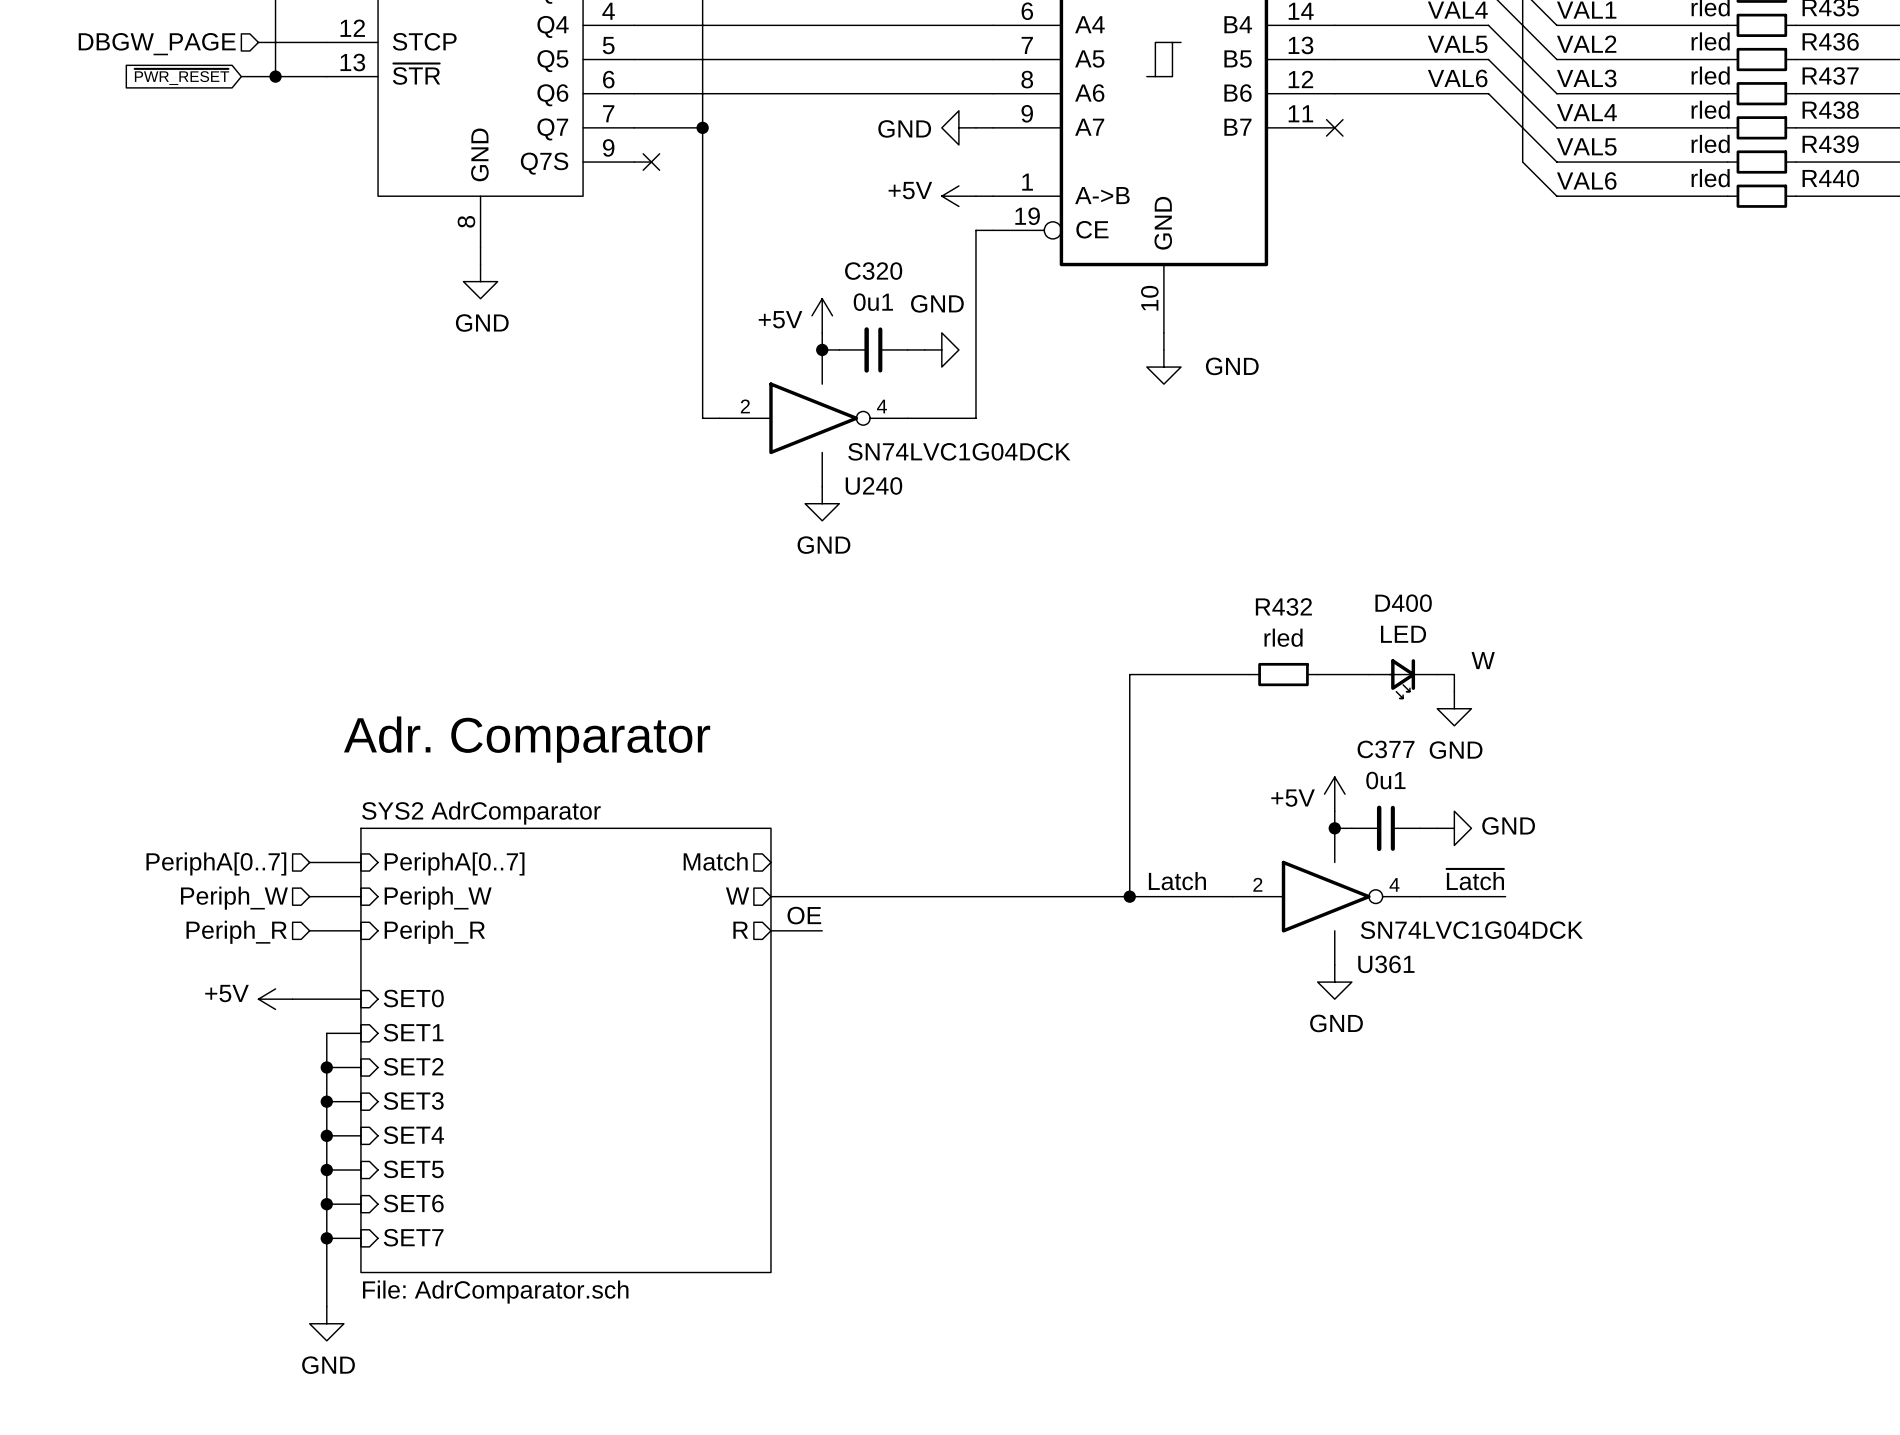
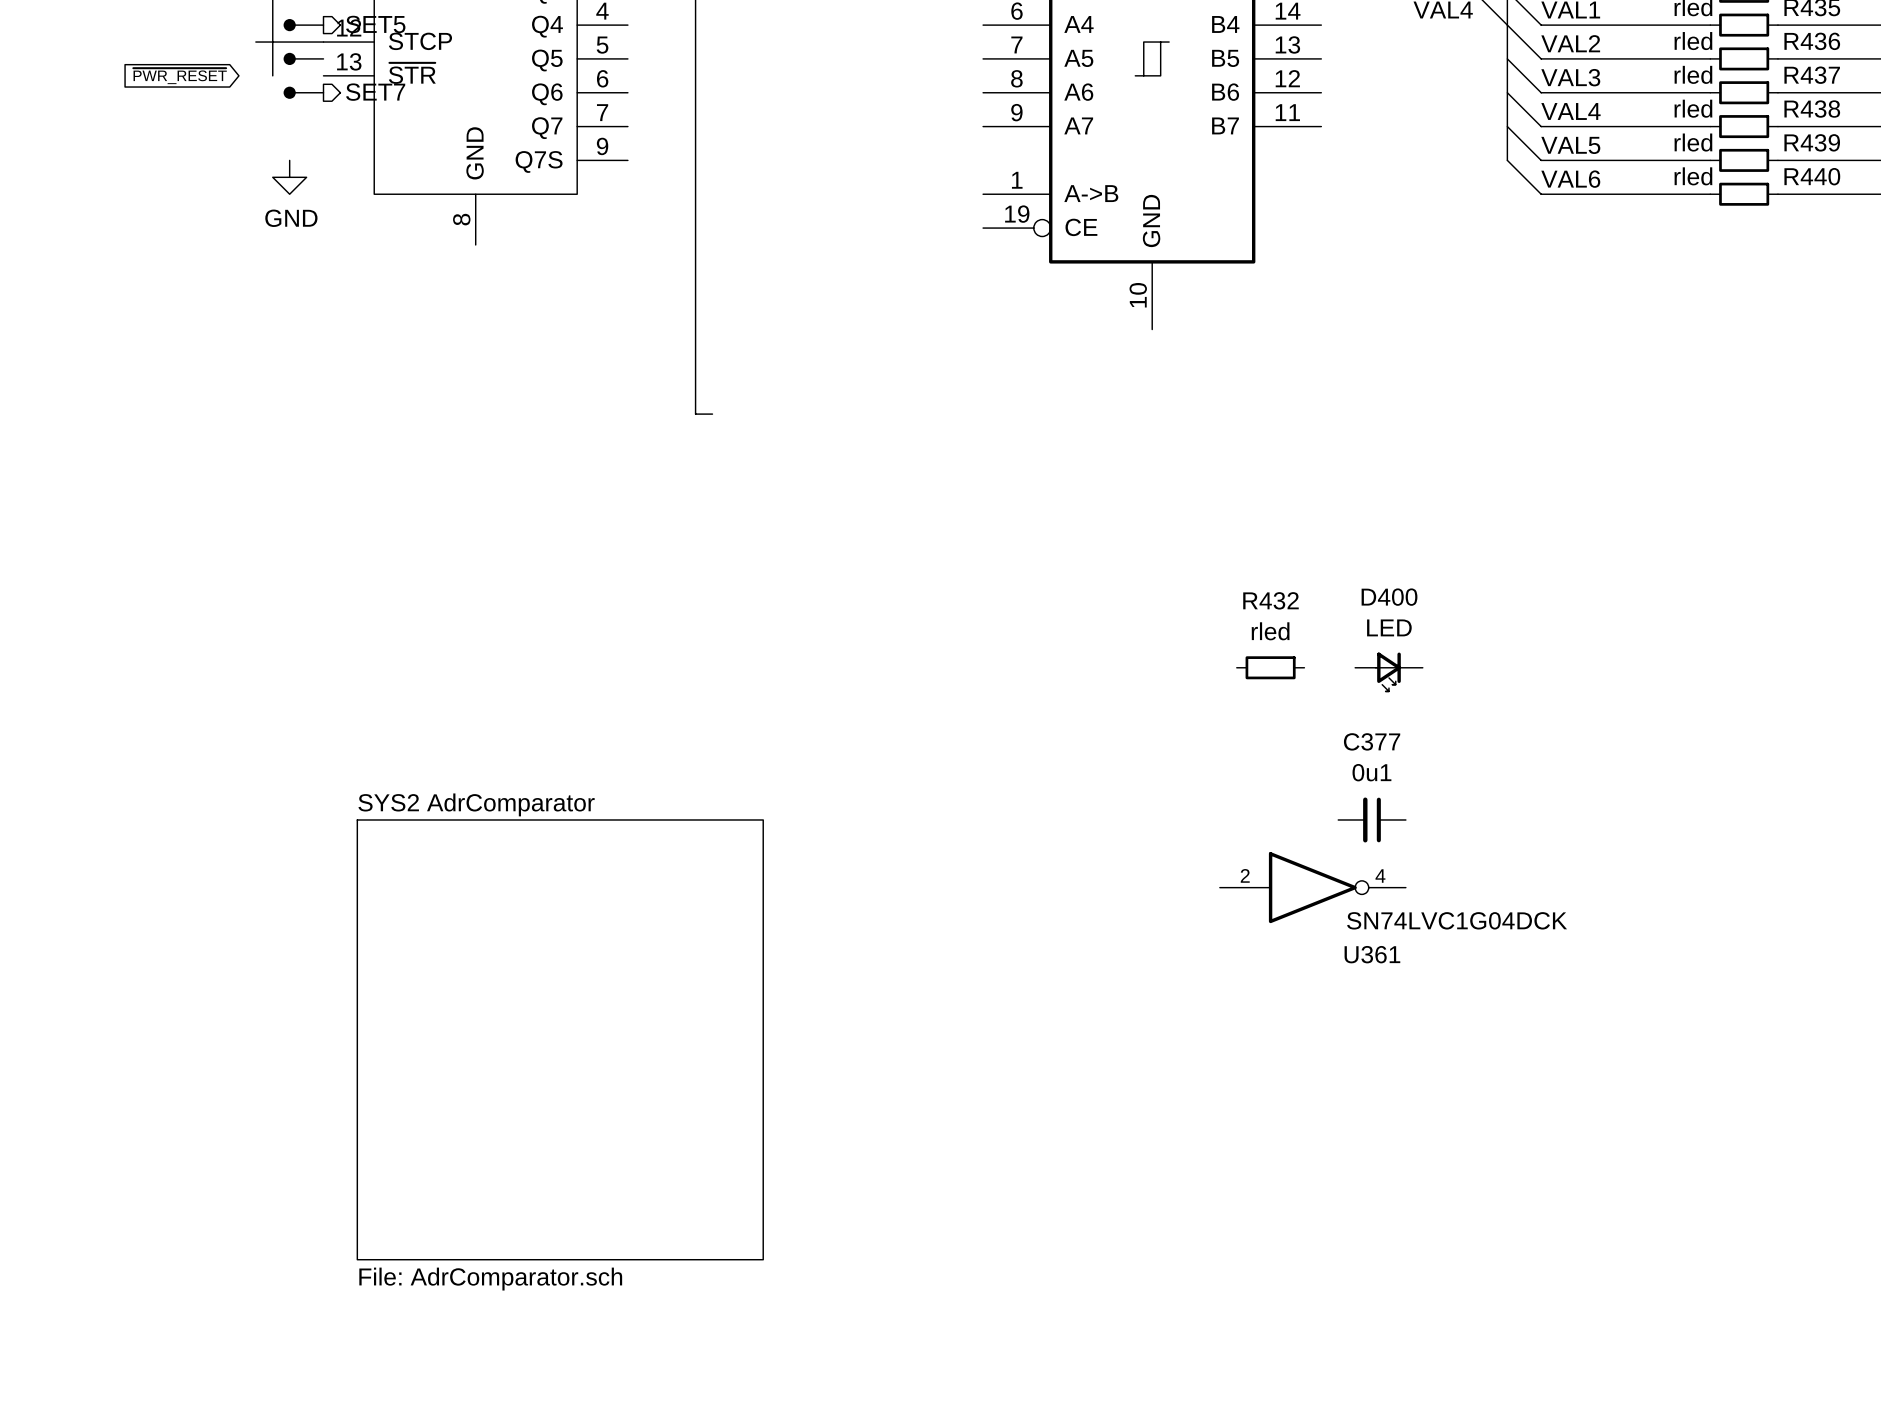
sheet pin: none -> SET5 (375, 24)
wire: none -> (289, 25) (323, 25)
junction: none -> (289, 25)
wire: (634, 25) (993, 25) -> none
wire: (1334, 25) (1488, 25) (1522, 59) -> none
hierarchical label: DBGW_PAGE (157, 44) -> none
label: VAL5 (1457, 44) -> none
wire: none -> (289, 58) (323, 58)
junction: none -> (289, 58)
wire: (634, 59) (993, 59) -> none
wire: (1334, 59) (1488, 59) (1522, 93) -> none
wire: (241, 76) (326, 76) -> none
junction: (275, 76) -> none
label: VAL6 (1457, 78) -> none
wire: none -> (289, 92) (323, 92)
junction: none -> (289, 92)
sheet pin: none -> SET7 (375, 92)
wire: (634, 93) (993, 93) -> none
wire: (1334, 93) (1488, 93) (1522, 127) -> none
wire: (634, 127) (702, 127) -> none
junction: (702, 127) -> none
power symbol: GND (958, 127) -> none
wire: (975, 127) (993, 127) -> none
no-connect mark: (1334, 127) -> none
wire: (634, 162) (651, 162) -> none
no-connect mark: (651, 162) -> none
power symbol: +5V (958, 196) -> none
wire: (975, 196) (993, 196) -> none
wire: (993, 230) (975, 230) (975, 418) (907, 418) -> none
wire: (480, 247) (480, 264) -> none
power symbol position: GND (480, 281) -> GND (289, 177)
power symbol: +5V (822, 315) -> none
wire: (822, 332) (822, 384) -> none
wire: (1163, 332) (1163, 349) -> none
wire: (822, 349) (839, 349) -> none
junction: (822, 349) -> none
C320: 0u1 (873, 349) -> none
wire: (907, 349) (924, 349) -> none
power symbol: GND (941, 349) -> none
power symbol: GND (1163, 367) -> none
U240: SN74LVC1G04DCK (813, 418) -> none
wire: (822, 452) (822, 486) -> none
power symbol: GND (822, 503) -> none
text: W (1483, 660) -> none
wire: (1249, 674) (1129, 674) (1129, 896) -> none
wire: (1317, 674) (1368, 674) -> none
wire: (1437, 674) (1454, 674) (1454, 691) -> none
power symbol: GND (1454, 708) -> none
text: Adr. Comparator (527, 739) -> none
power symbol: +5V (1334, 794) -> none
wire: (1334, 811) (1334, 862) -> none
wire: (1334, 828) (1351, 828) -> none
junction: (1334, 828) -> none
wire: (1420, 828) (1437, 828) -> none
power symbol: GND (1454, 828) -> none
sheet pin: Match (715, 861) -> none
bus: (309, 862) (360, 862) -> none
hierarchical label: PeriphA[0..7] (216, 863) -> none
sheet pin: PeriphA[0..7] (454, 863) -> none
label: ~{Latch} (1475, 879) -> none
label: Latch (1177, 881) -> none
wire: (309, 896) (360, 896) -> none
sheet pin: W (737, 896) -> none
wire: (770, 896) (1232, 896) -> none
junction: (1129, 896) -> none
wire: (1420, 896) (1505, 896) -> none
hierarchical label: Periph_W (234, 898) -> none
sheet pin: Periph_W (438, 898) -> none
label: OE (804, 915) -> none
wire: (309, 930) (360, 930) -> none
sheet pin: R (740, 930) -> none
wire: (770, 930) (822, 930) -> none
wire: (1334, 930) (1334, 964) -> none
hierarchical label: Periph_R (236, 932) -> none
sheet pin: Periph_R (434, 932) -> none
power symbol: GND (1334, 982) -> none
sheet pin: SET0 (413, 998) -> none
power symbol: +5V (275, 999) -> none
wire: (292, 999) (360, 999) -> none
sheet pin: SET1 (413, 1032) -> none
wire: (360, 1033) (326, 1033) (326, 1306) -> none
sheet pin: SET2 (413, 1066) -> none
wire: (326, 1067) (360, 1067) -> none
junction: (326, 1067) -> none
wire: (326, 1101) (360, 1101) -> none
junction: (326, 1101) -> none
sheet pin: SET3 (413, 1101) -> none
wire: (326, 1135) (360, 1135) -> none
junction: (326, 1135) -> none
sheet pin: SET4 (413, 1135) -> none
sheet pin: SET5 (413, 1169) -> none
wire: (326, 1170) (360, 1170) -> none
junction: (326, 1170) -> none
sheet pin: SET6 (413, 1203) -> none
wire: (326, 1204) (360, 1204) -> none
junction: (326, 1204) -> none
sheet pin: SET7 (413, 1237) -> none
wire: (326, 1238) (360, 1238) -> none
junction: (326, 1238) -> none
power symbol: GND (326, 1323) -> none

